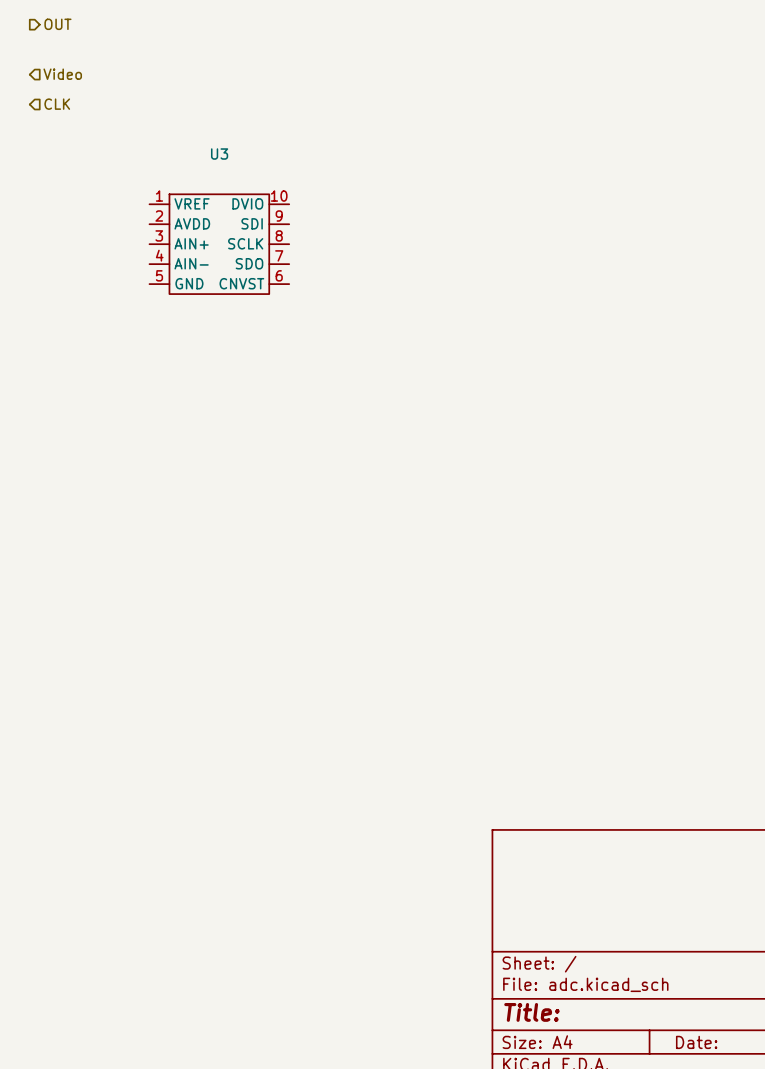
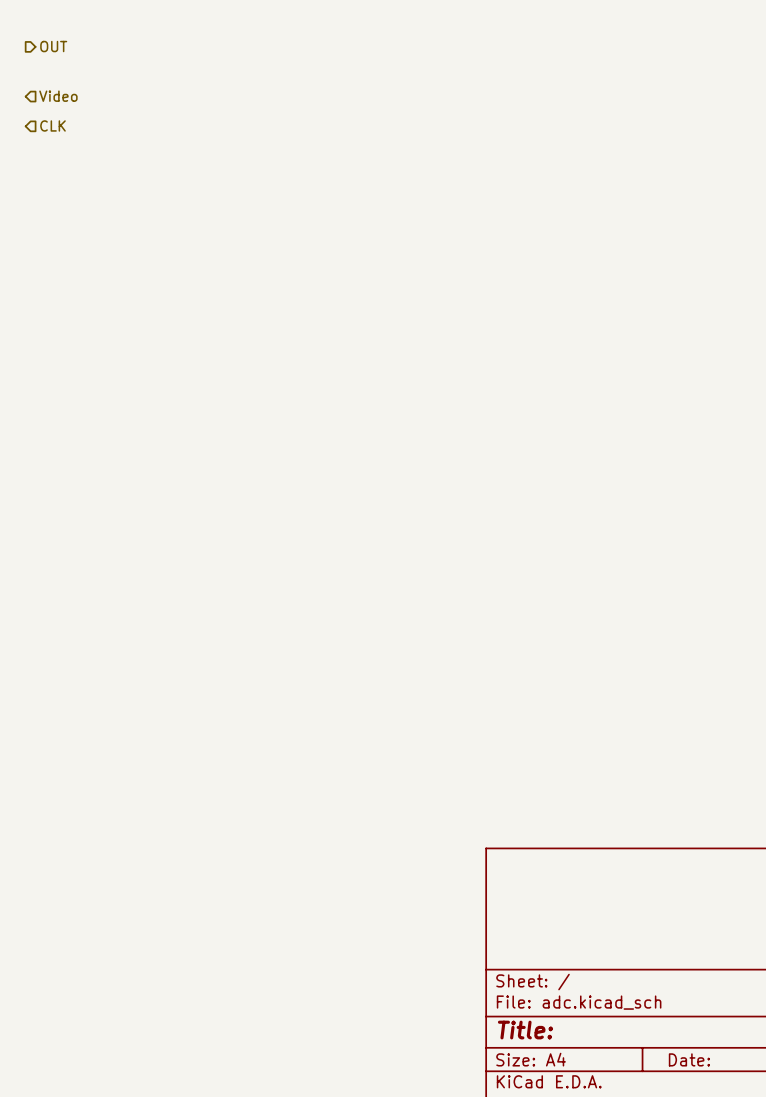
U3: (219, 244) -> none

